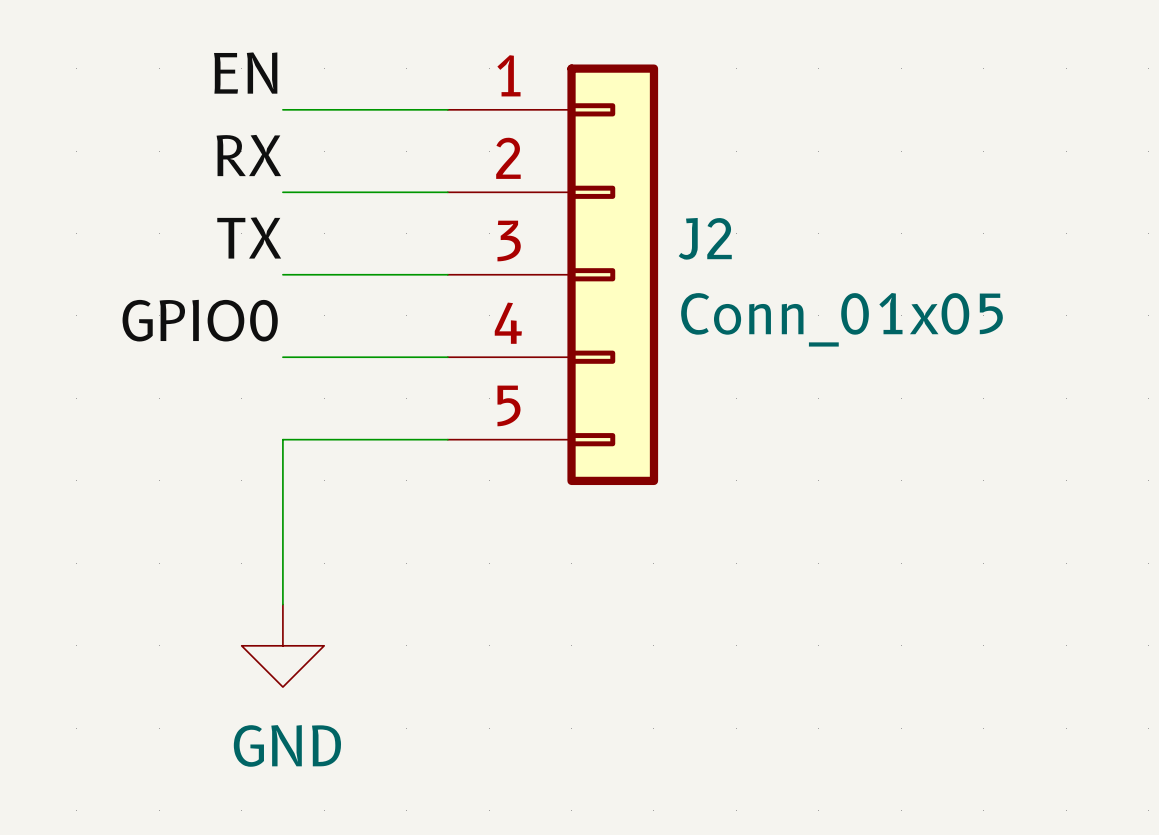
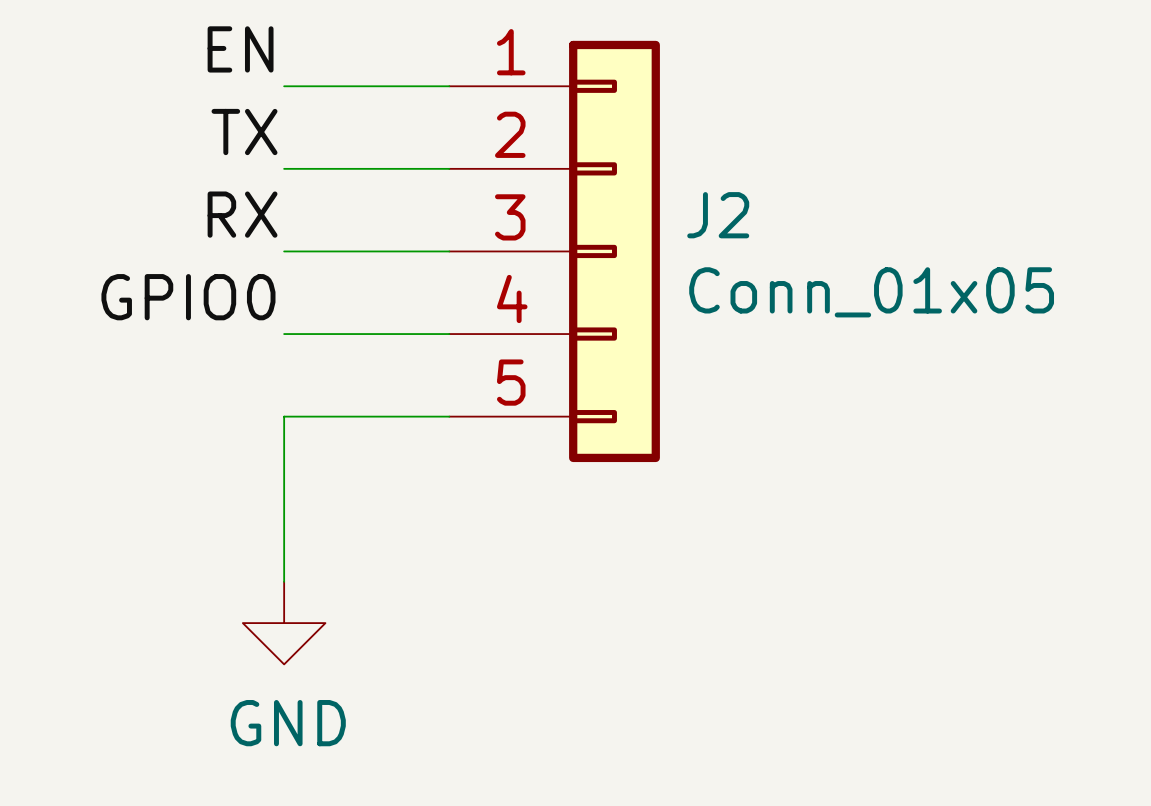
label: RX (248, 155) -> TX (244, 132)
label: TX (249, 237) -> RX (242, 214)

